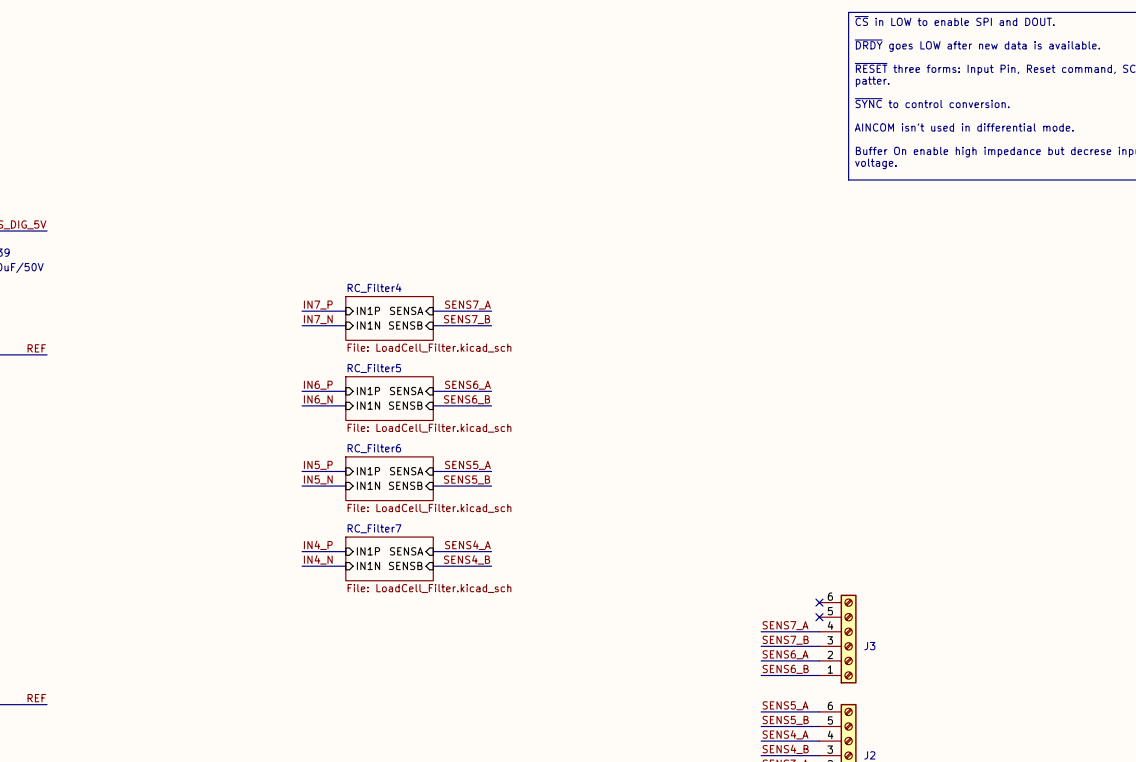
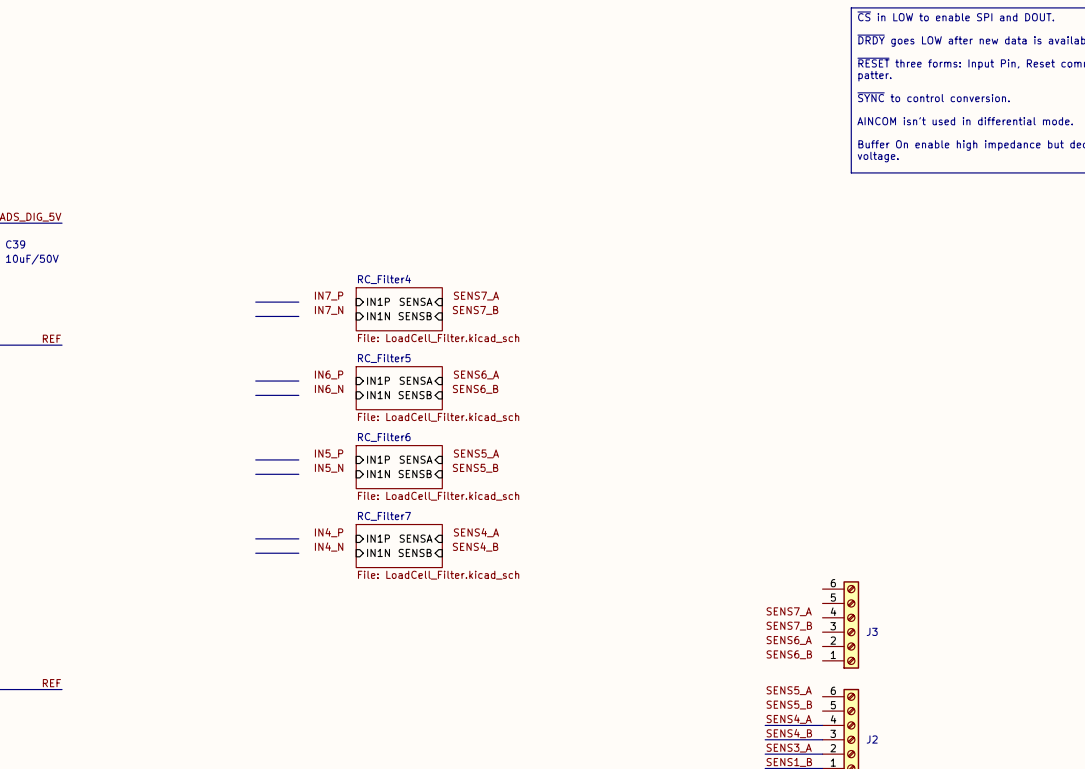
wire: (302, 311) (345, 311) -> (255, 302) (298, 302)
wire: (433, 311) (491, 311) -> none
wire: (302, 325) (345, 325) -> (255, 316) (298, 316)
wire: (433, 325) (491, 325) -> none
wire: (302, 391) (345, 391) -> (255, 381) (298, 381)
wire: (433, 391) (491, 391) -> none
wire: (302, 405) (345, 405) -> (255, 395) (298, 395)
wire: (433, 405) (491, 405) -> none
wire: (302, 471) (345, 471) -> (255, 459) (298, 459)
wire: (433, 471) (491, 471) -> none
wire: (302, 486) (345, 486) -> (255, 474) (298, 474)
wire: (433, 486) (491, 486) -> none
wire: (302, 551) (345, 551) -> (255, 538) (298, 538)
wire: (433, 551) (491, 551) -> none
wire: (302, 566) (345, 566) -> (255, 553) (298, 553)
wire: (433, 566) (491, 566) -> none
no-connect mark: (819, 602) -> none
no-connect mark: (819, 617) -> none
wire: (761, 631) (819, 631) -> none
wire: (761, 646) (819, 646) -> none
wire: (761, 660) (819, 660) -> none
wire: (761, 675) (819, 675) -> none
wire: (761, 711) (819, 711) -> none
wire: (761, 726) (819, 726) -> none

